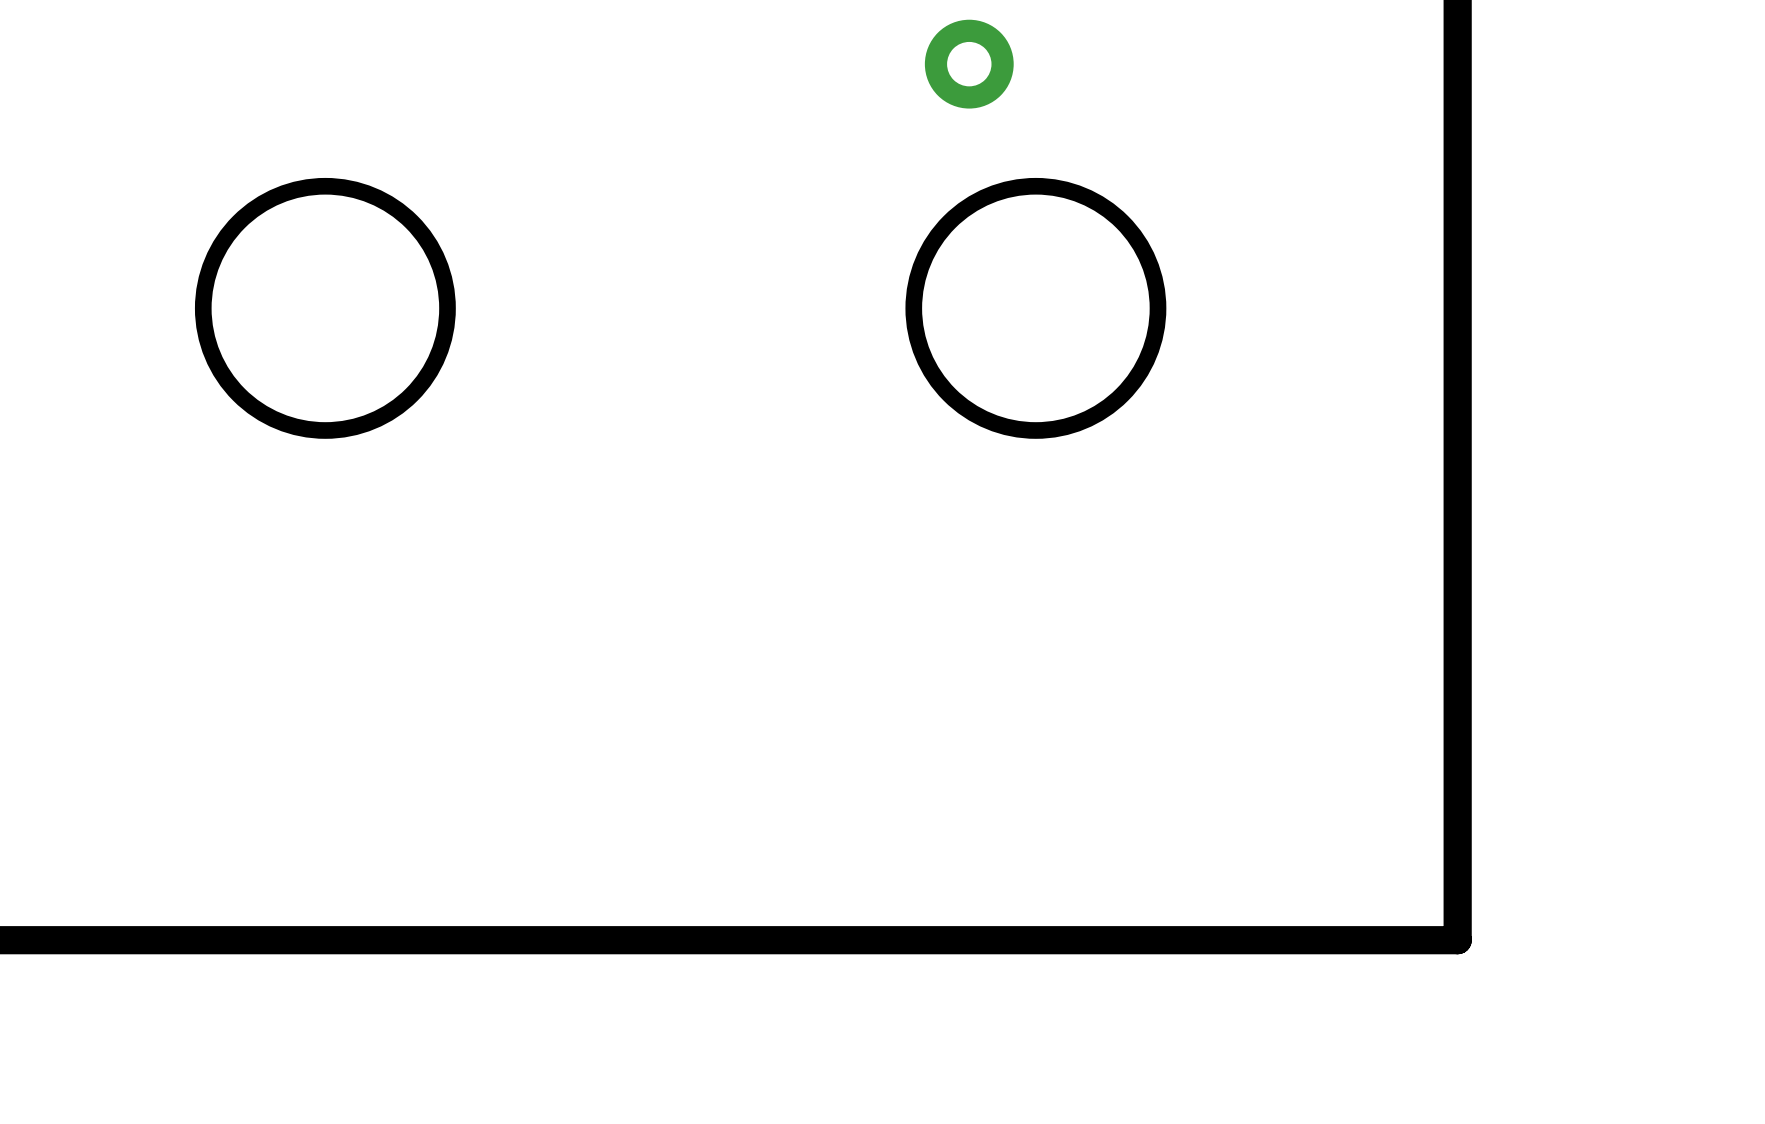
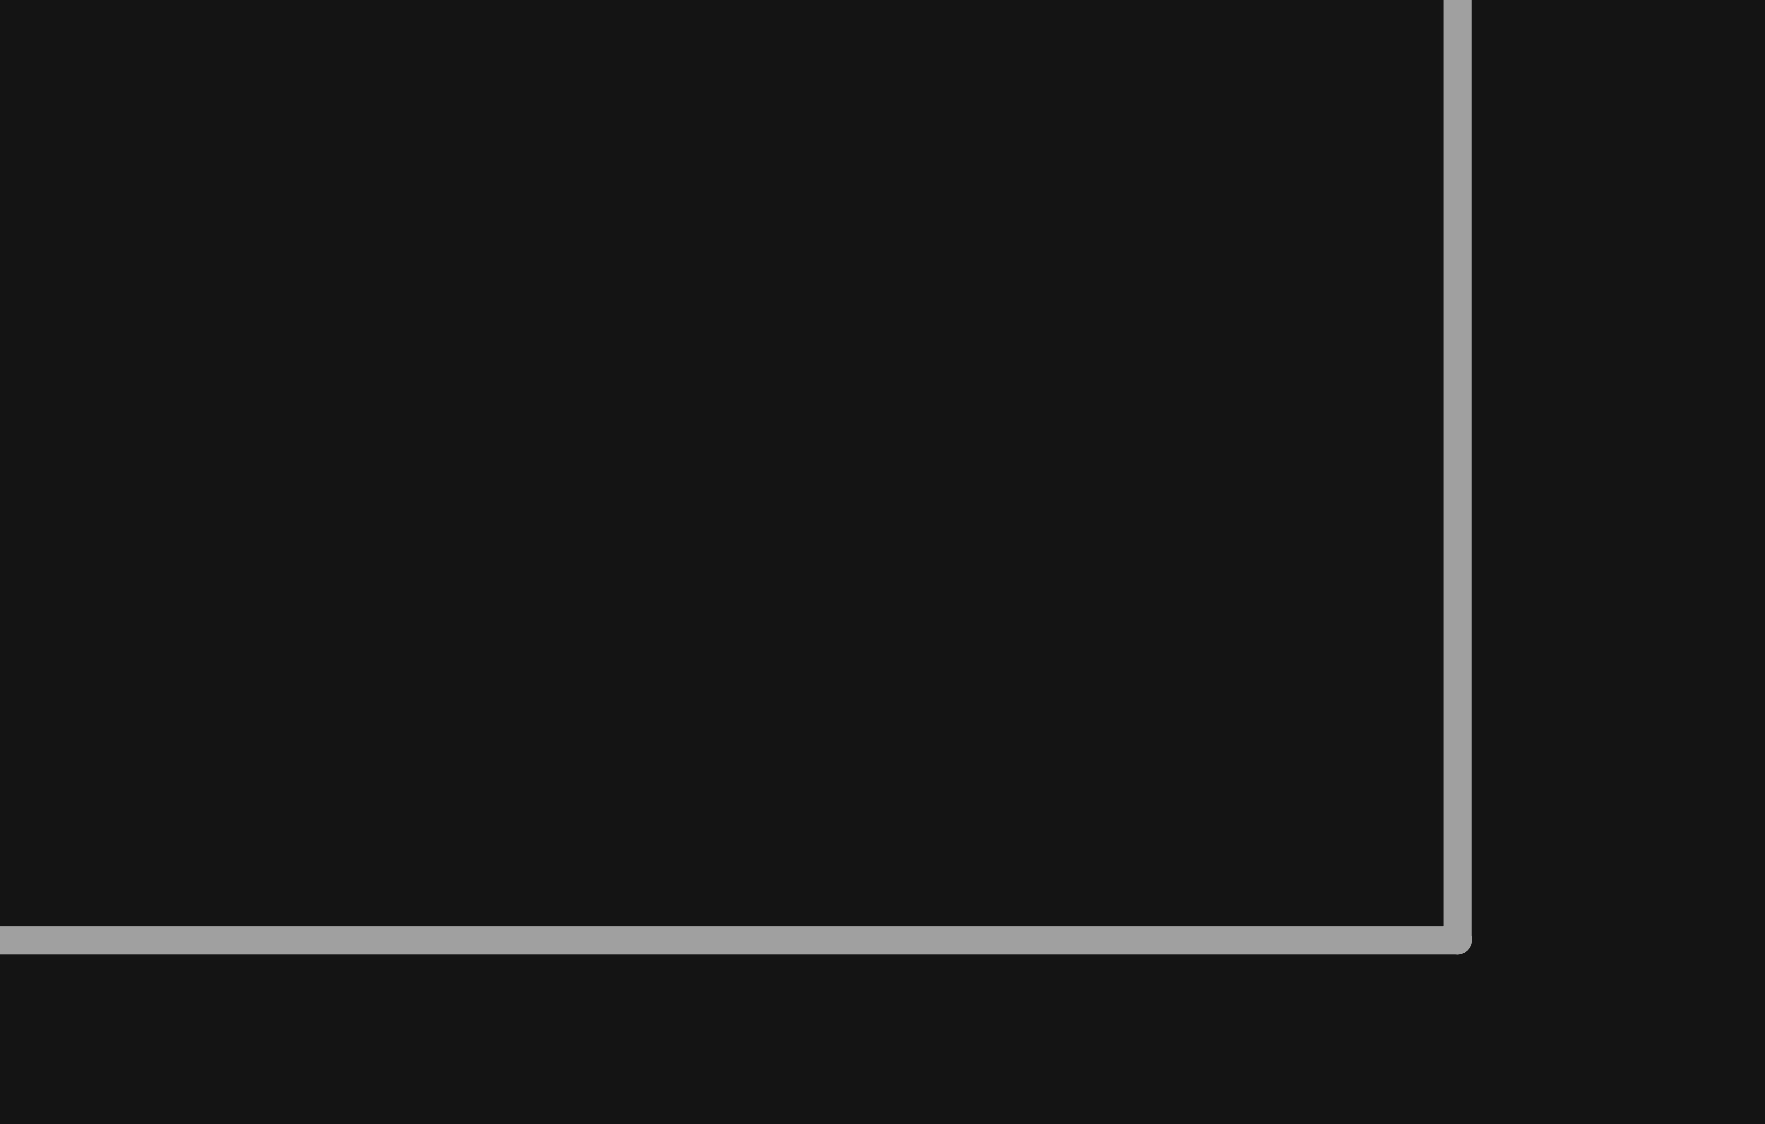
via: (969, 64) -> none
round board edge: [194, 177, 456, 439] -> none
round board edge: [905, 177, 1167, 439] -> none

